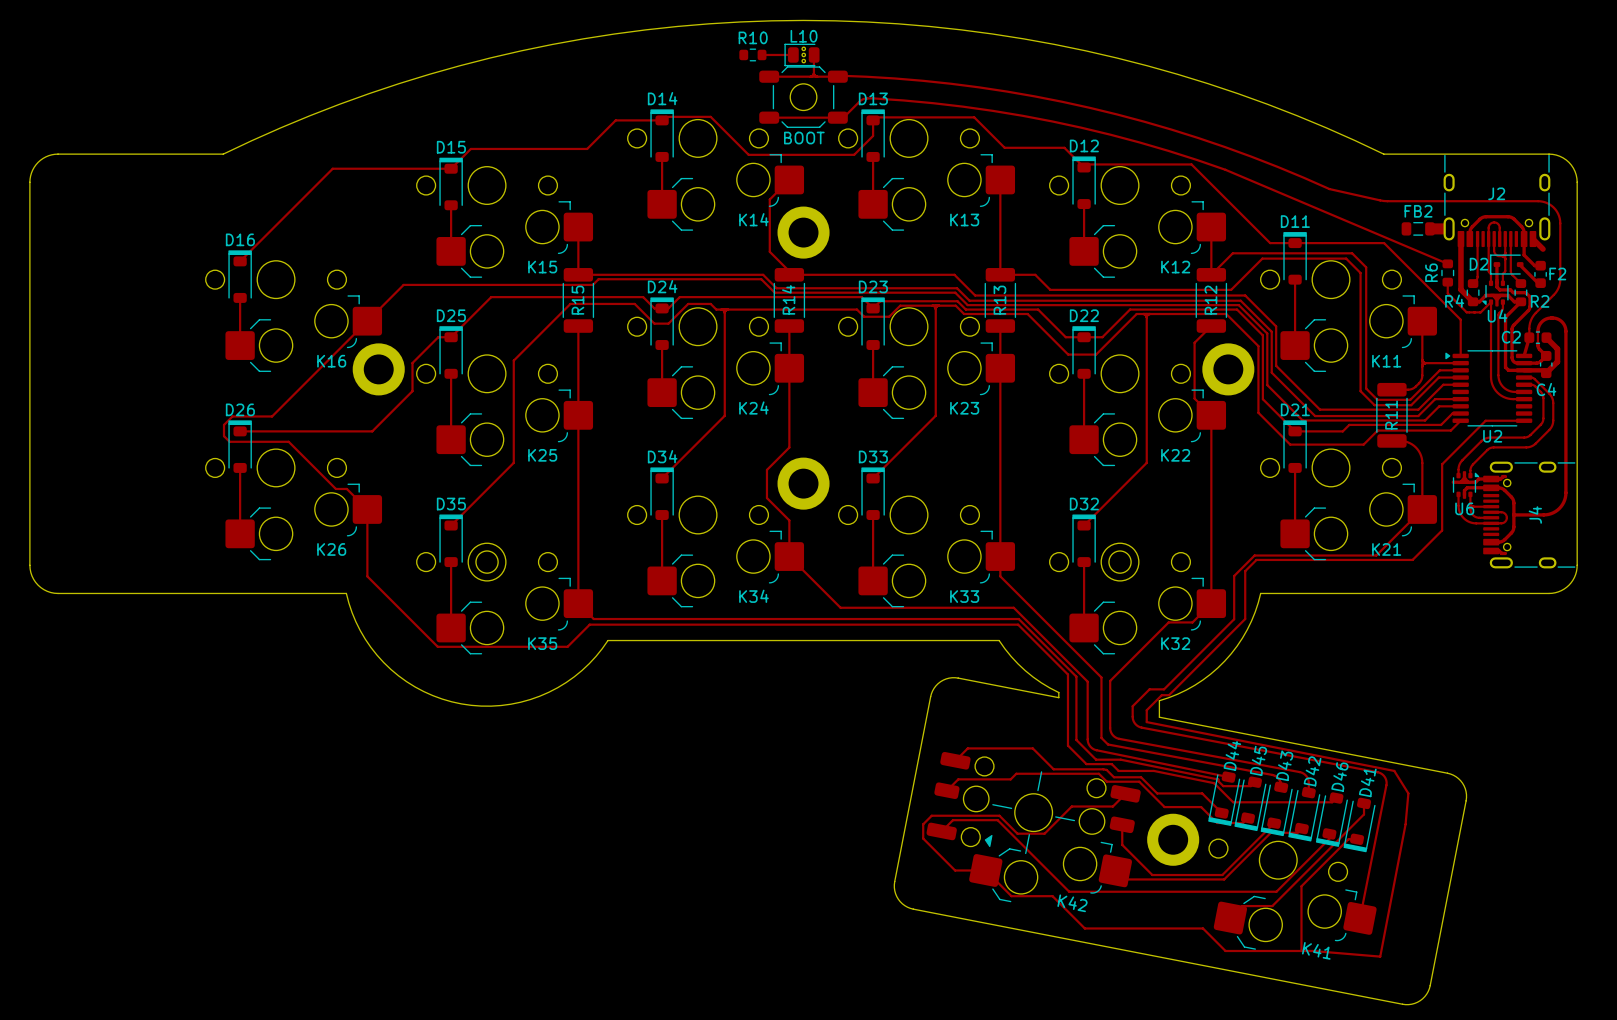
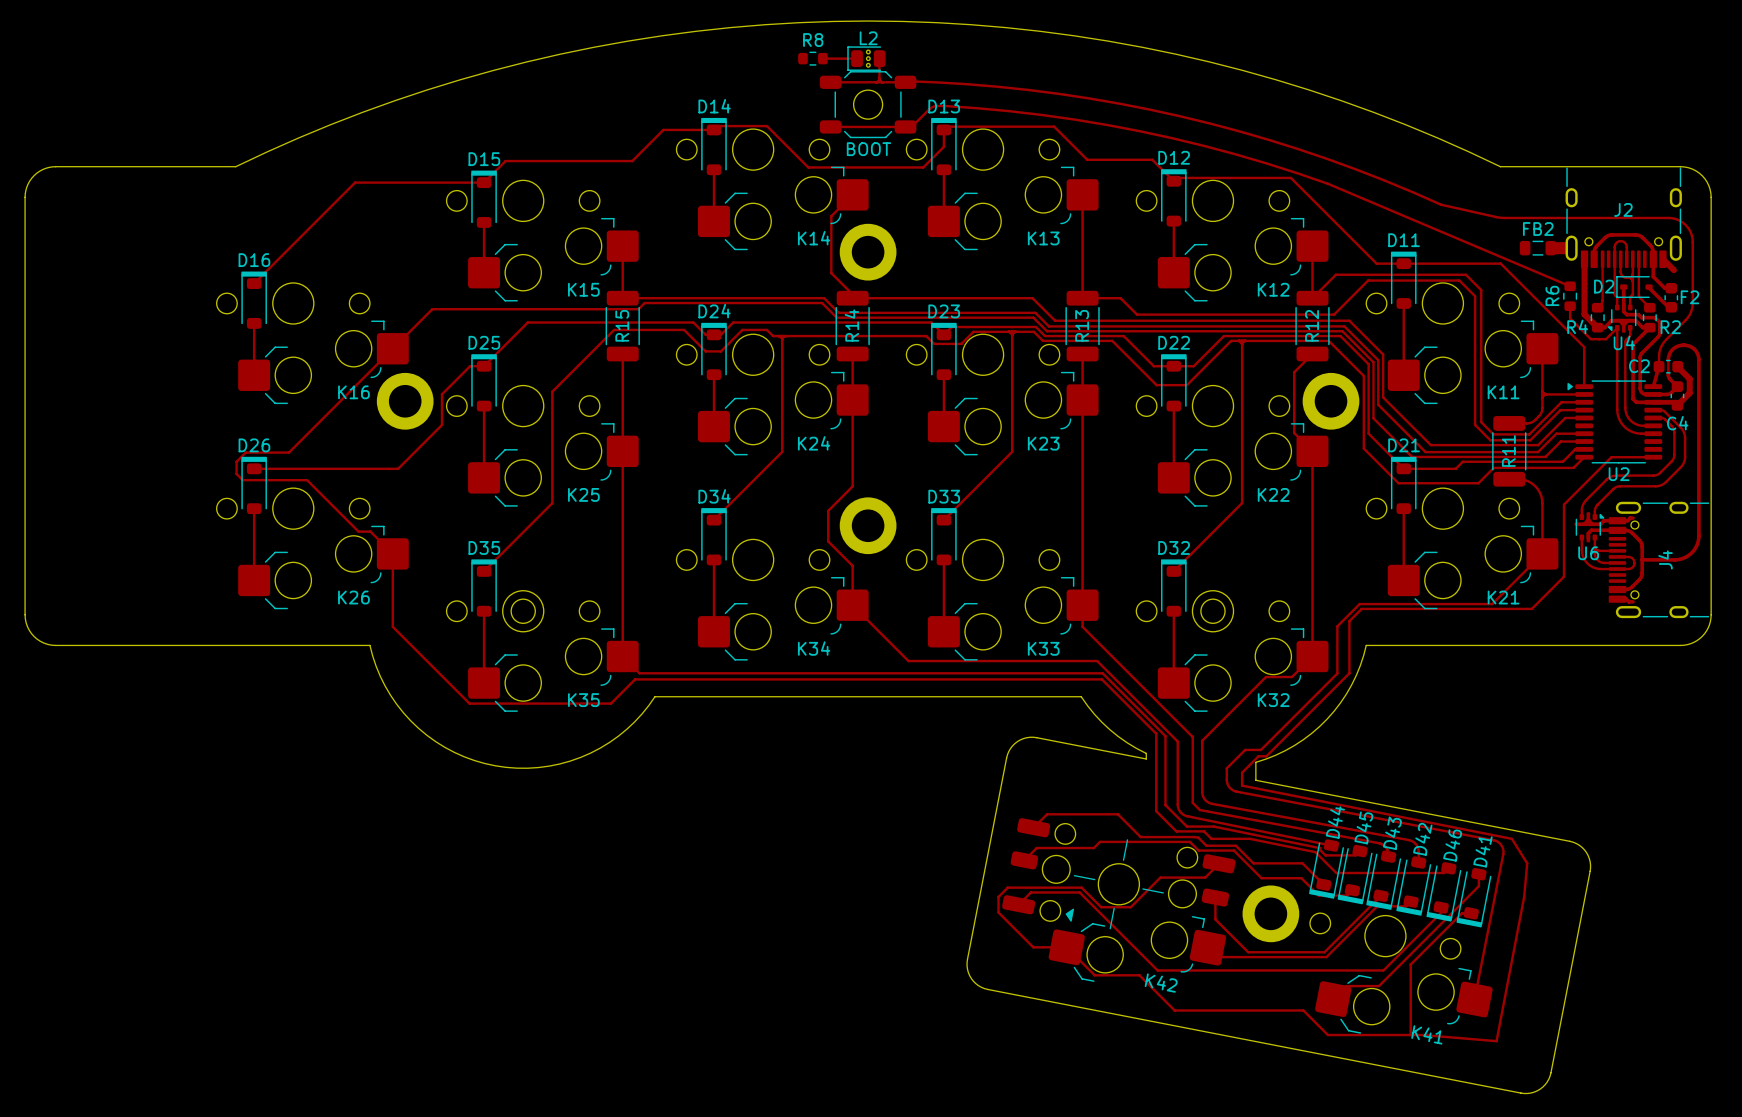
L10 name: L10 (804, 36) -> L2 (868, 38)
R10 name: R10 (753, 37) -> R8 (813, 40)

